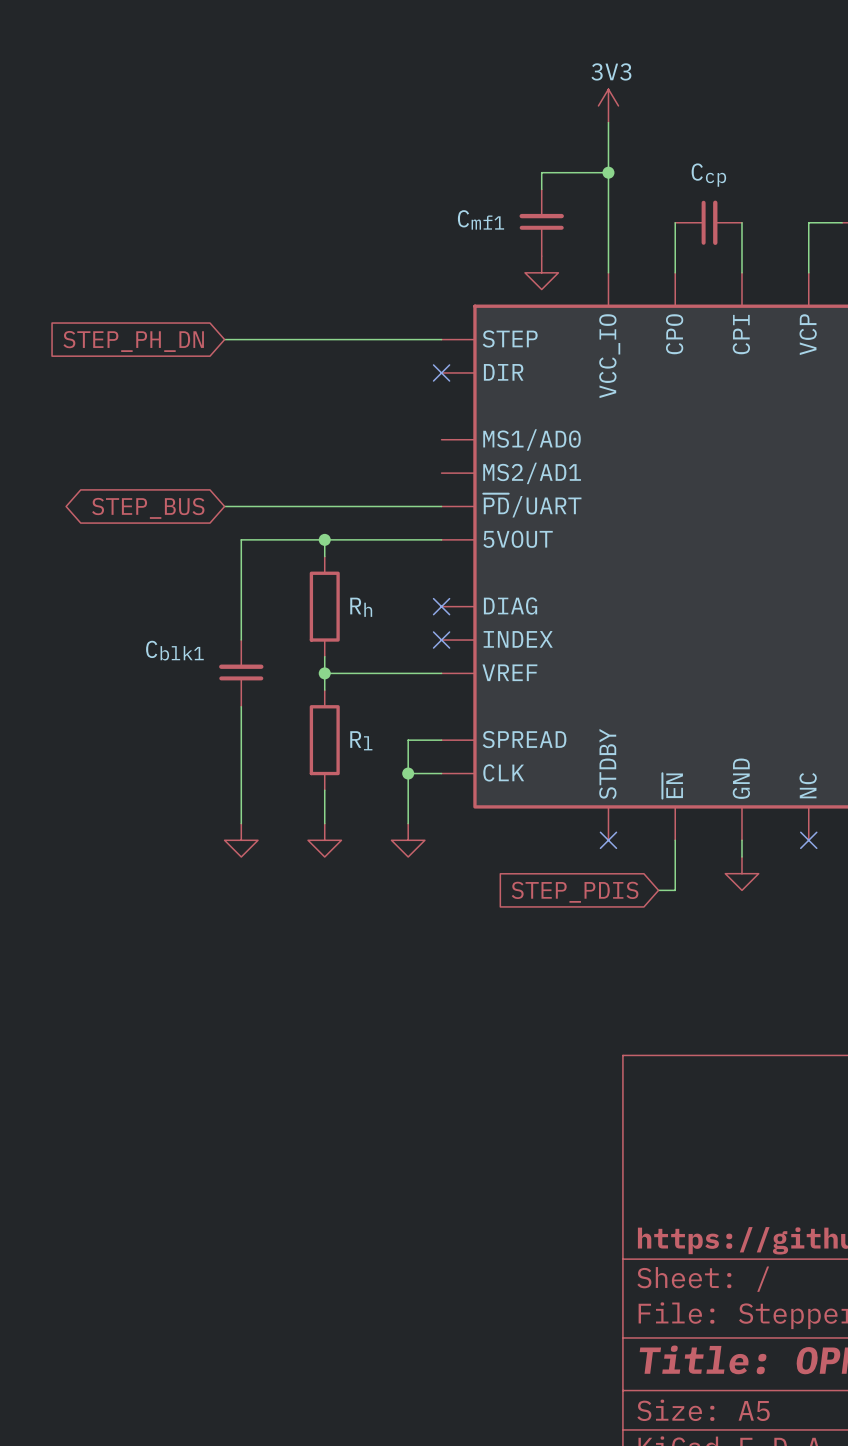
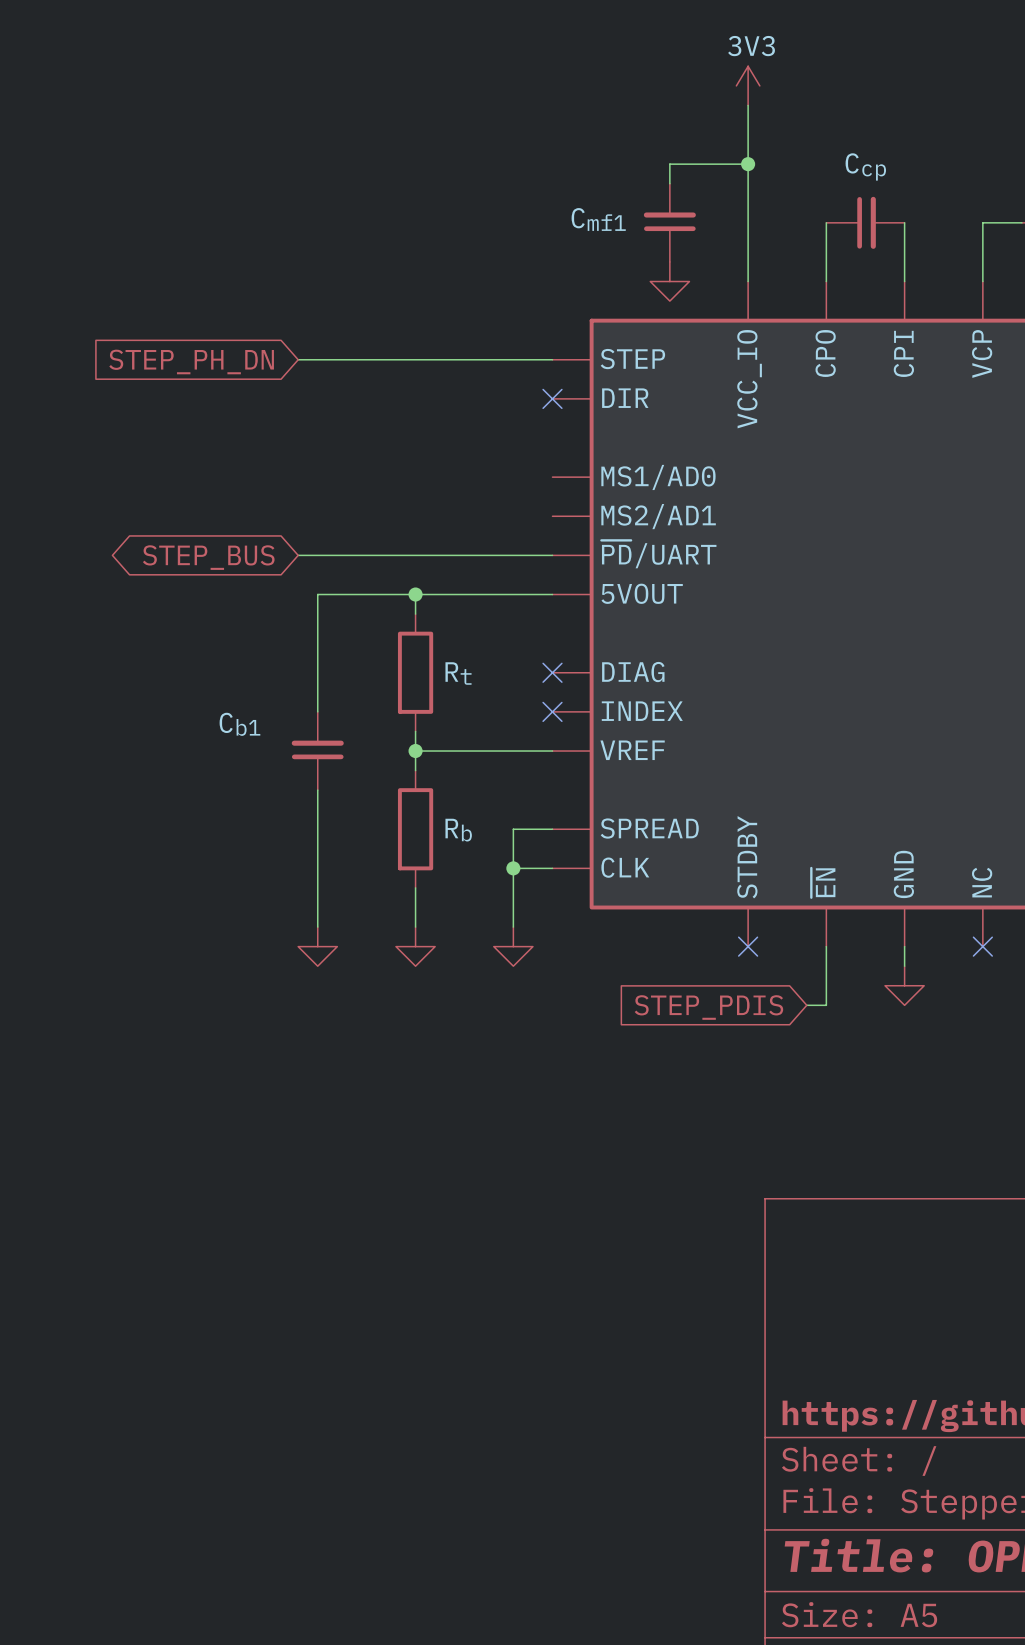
Rh name: Rh (361, 607) -> Rt (458, 673)
Cblk1 name: Cblk1 (174, 650) -> Cb1 (239, 724)
Rl name: Rl (361, 740) -> Rb (458, 830)

